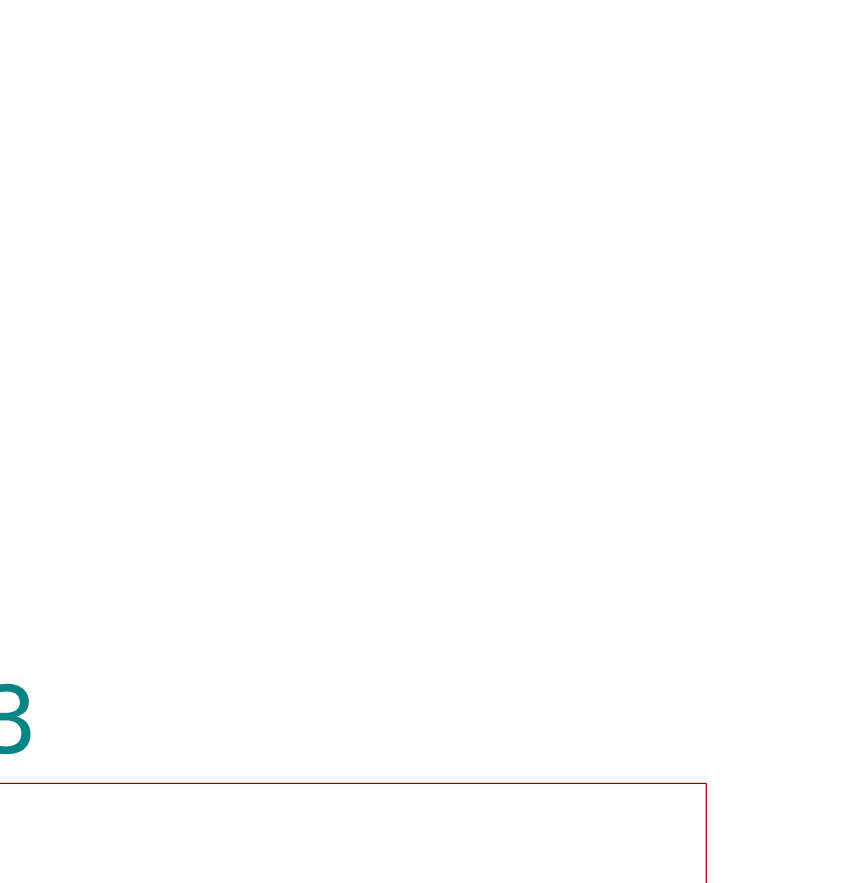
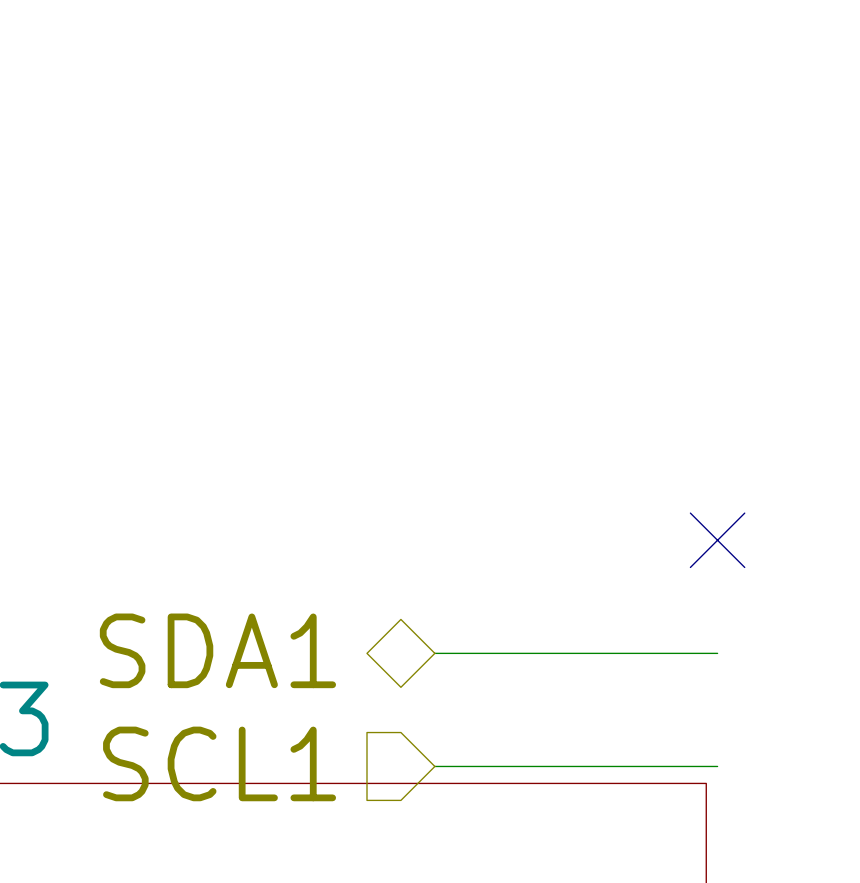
no-connect mark: none -> (717, 540)
hierarchical label: none -> SDA1 (217, 650)
wire: none -> (434, 653) (717, 653)
hierarchical label: none -> SCL1 (219, 763)
wire: none -> (434, 766) (717, 766)

